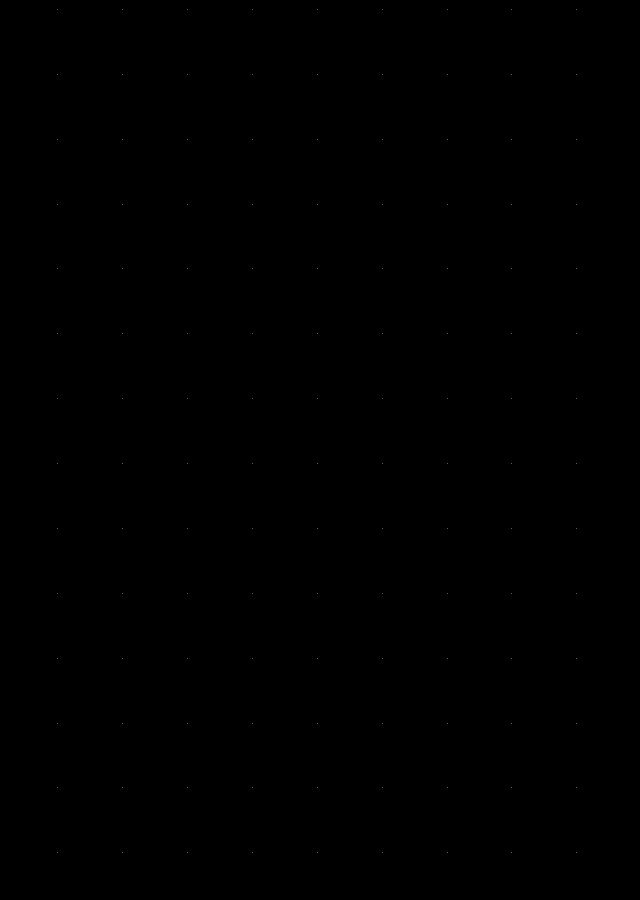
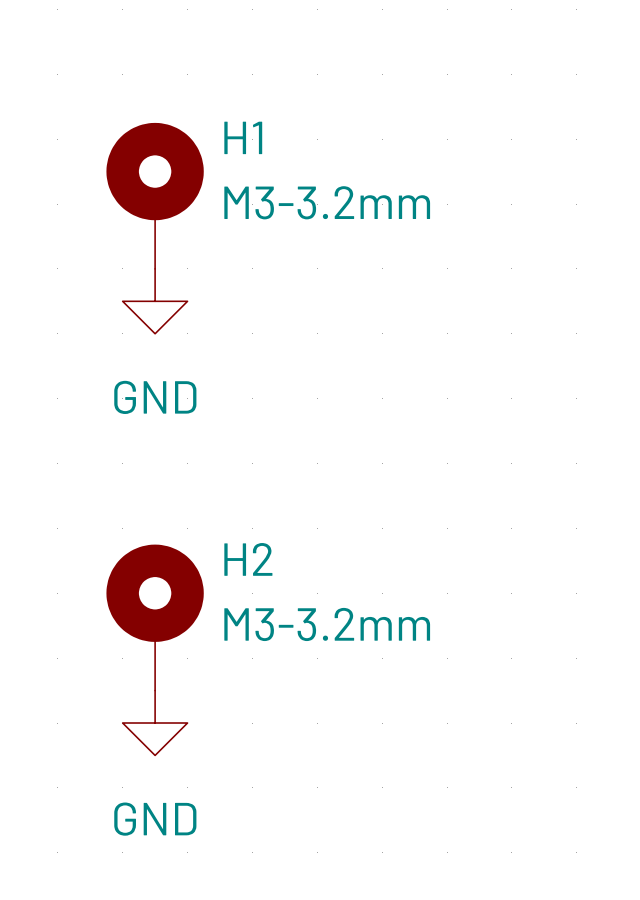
H1: none -> M3-3.2mm (155, 195)
power symbol: none -> GND (155, 301)
H2: none -> M3-3.2mm (155, 617)
power symbol: none -> GND (155, 723)

